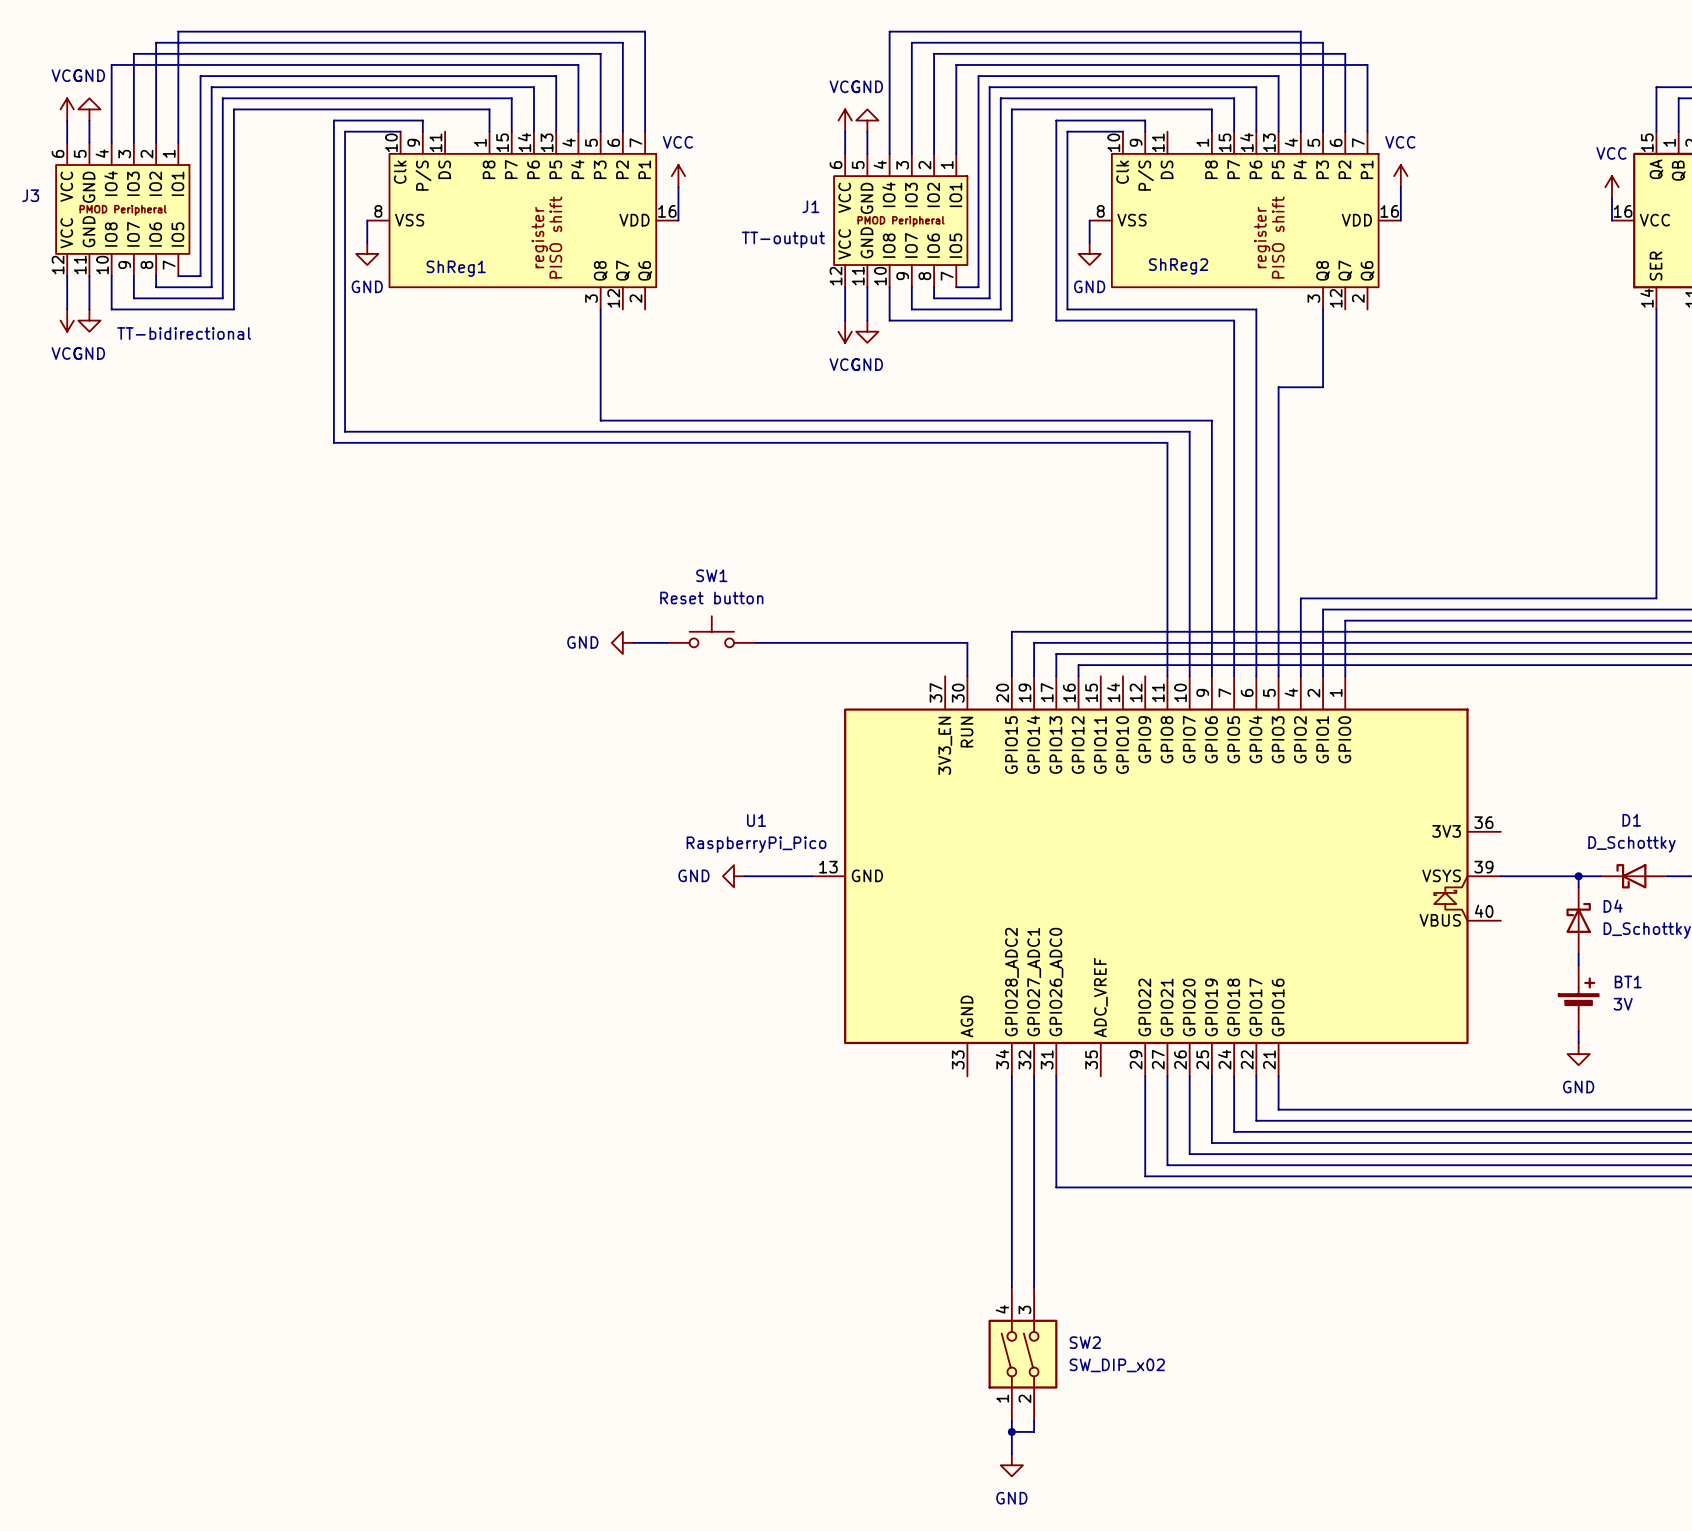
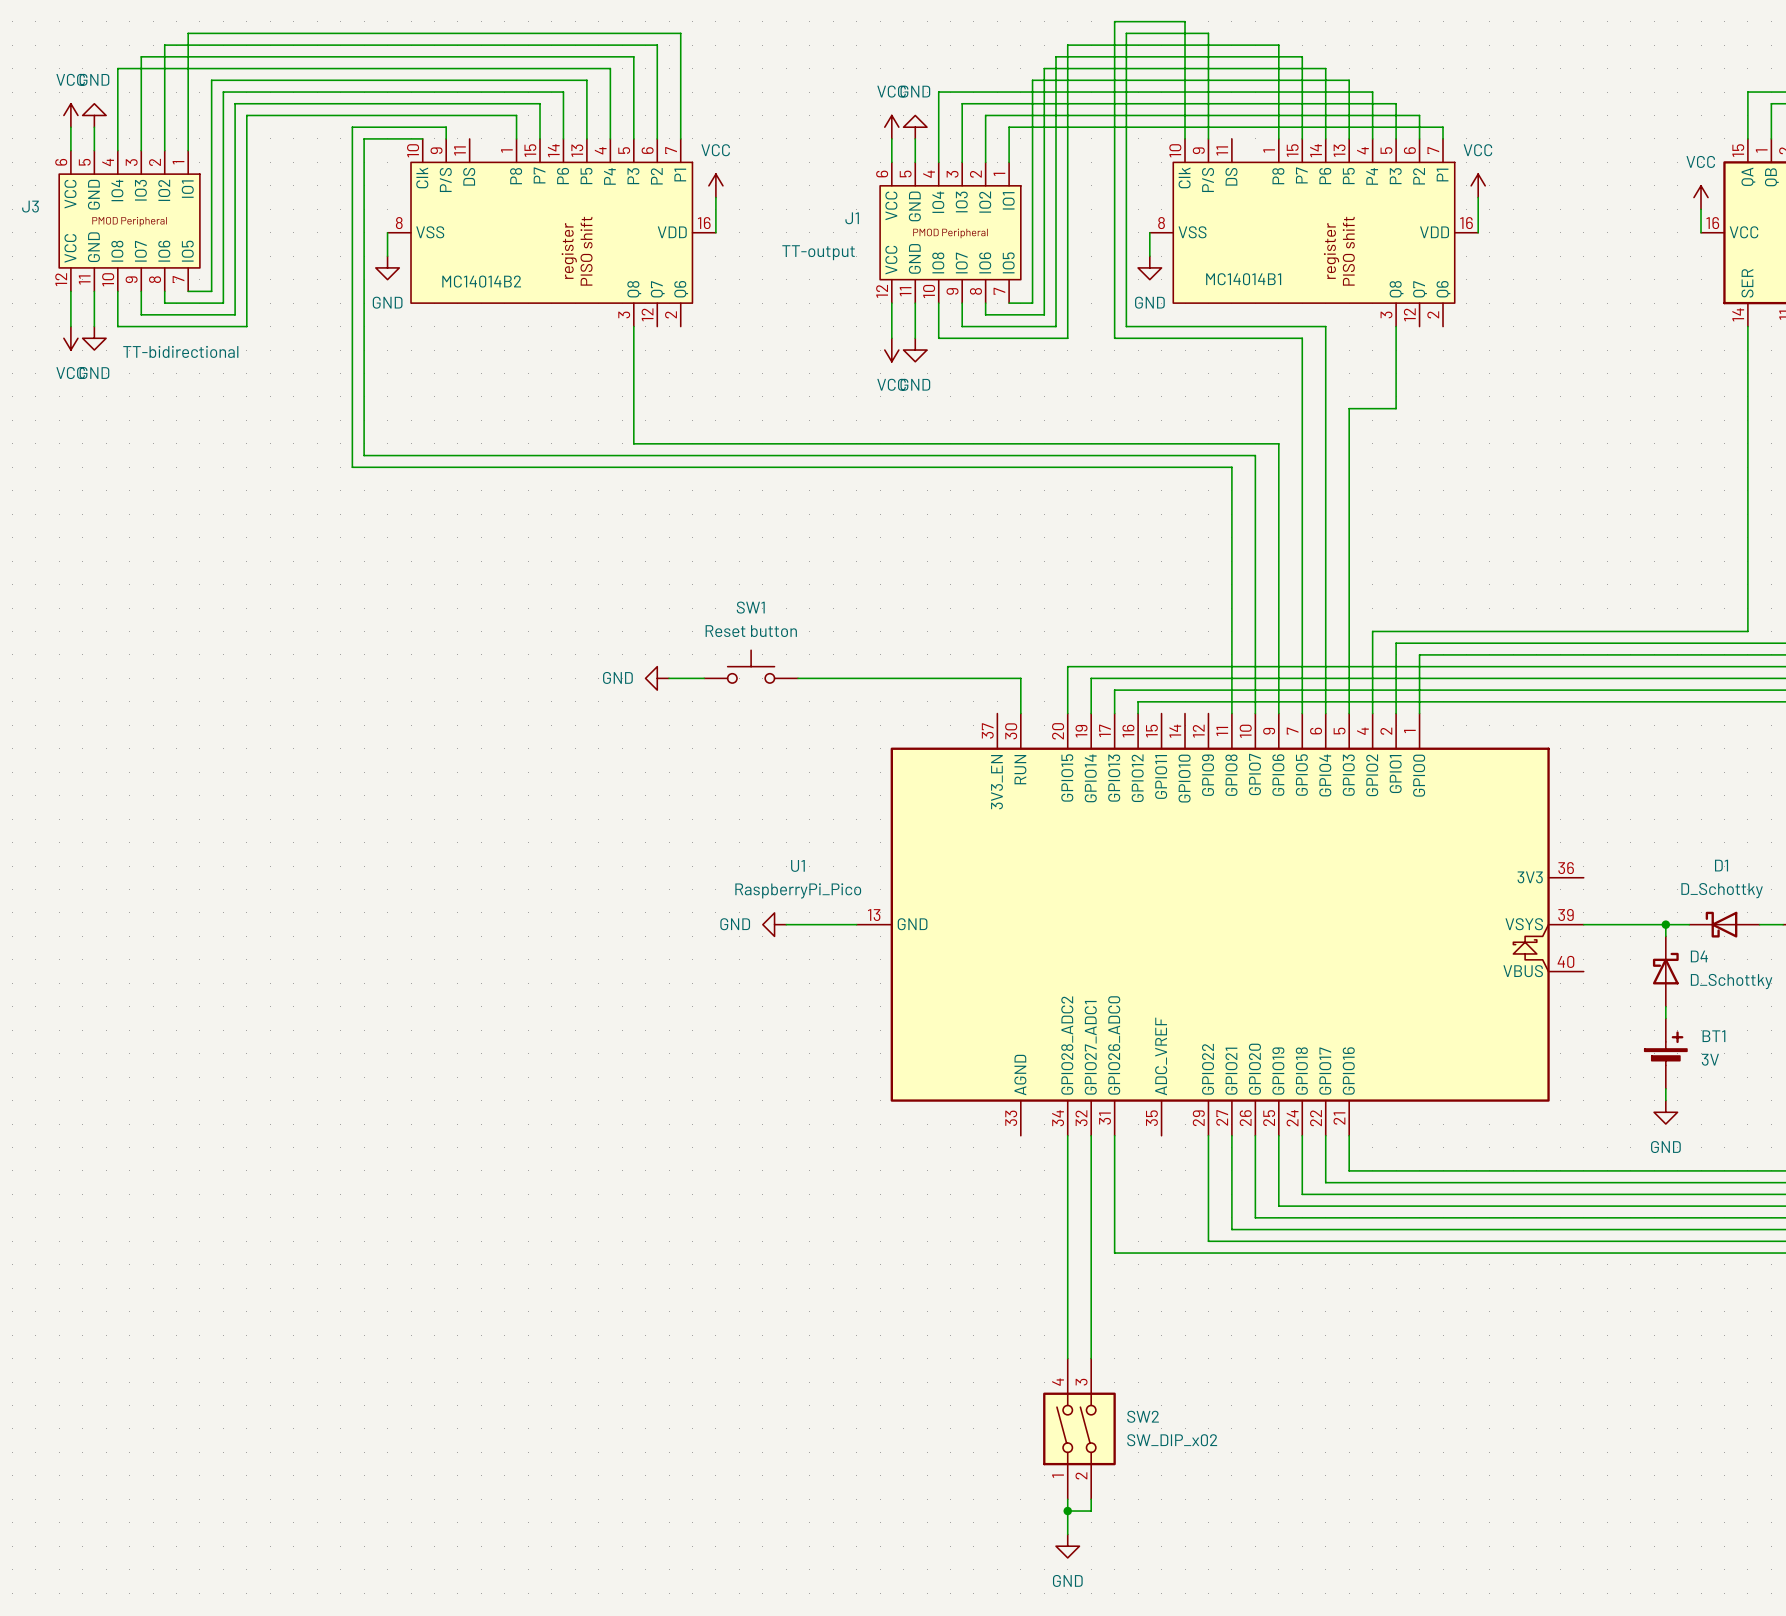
wire: (1067, 31) (889, 31) (889, 87) -> (1126, 33) (1126, 138)
wire: (1145, 31) (1300, 31) (1300, 87) -> (1208, 33) (1208, 127) (1443, 127)
wire: (1011, 42) (911, 42) (911, 98) -> (1056, 56) (1056, 103) (962, 103)
wire: (1211, 42) (1323, 42) (1323, 98) -> (1278, 45) (1278, 115) (1419, 115)
wire: (1000, 53) (934, 53) (934, 109) -> (1067, 45) (1067, 115) (985, 115)
wire: (1234, 53) (1345, 53) (1345, 109) -> (1302, 56) (1302, 103) (1396, 103)
wire: (989, 64) (956, 64) (956, 120) -> (1044, 68) (1044, 92) (938, 92)
wire: (1256, 64) (1367, 64) (1367, 120) -> (1325, 68) (1325, 92) (1372, 92)
wire: (1067, 131) (1122, 131) -> (1009, 127) (1114, 127) (1114, 21) (1185, 21) (1185, 138)
ShReg2 name: ShReg2 (1178, 266) -> MC14014B1 (1243, 279)
ShReg1 name: ShReg1 (456, 268) -> MC14014B2 (481, 281)

